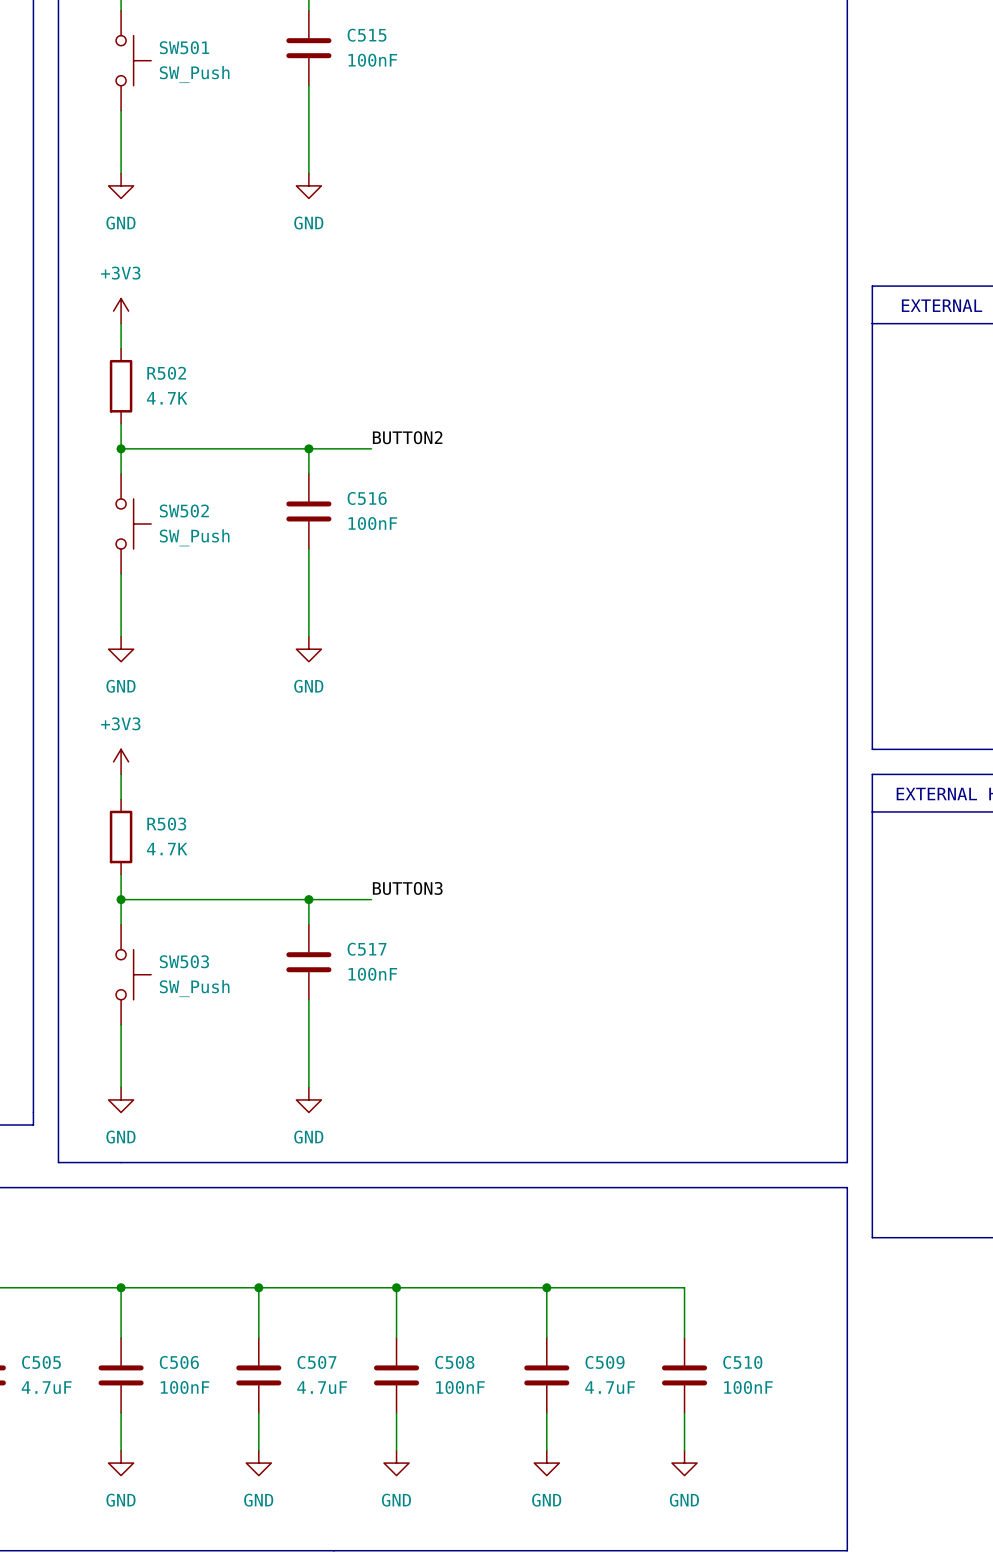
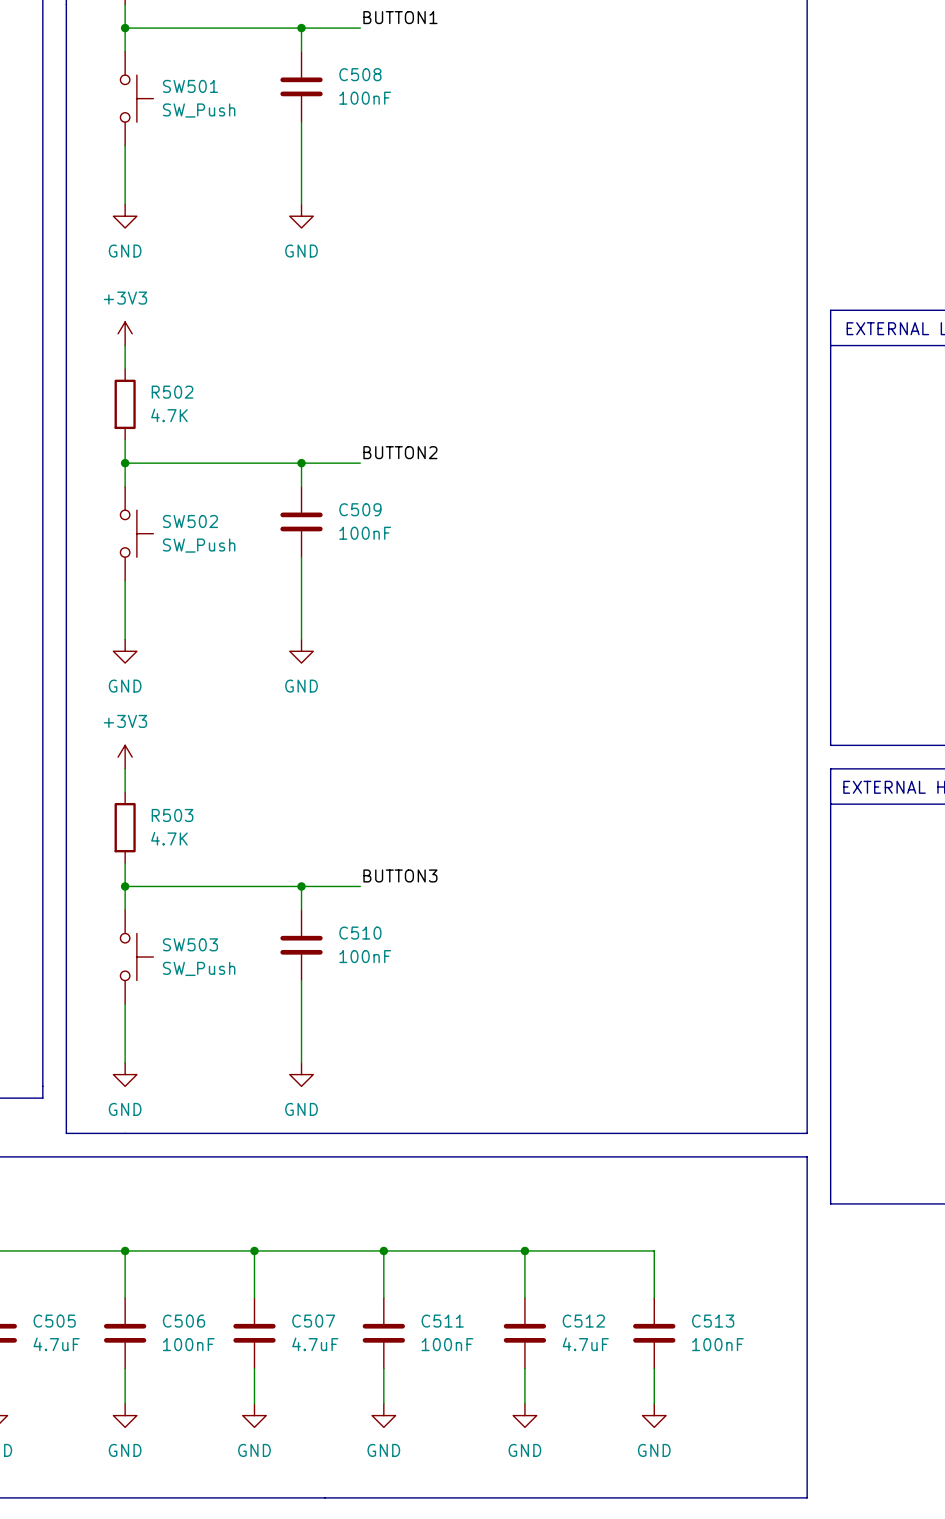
C515 name: C515 (367, 35) -> C508 (360, 74)
C516 name: C516 (367, 498) -> C509 (360, 509)
C517 name: C517 (367, 949) -> C510 (360, 933)
C508 name: C508 (454, 1362) -> C511 (442, 1321)
C509 name: C509 (605, 1362) -> C512 (583, 1321)
C510 name: C510 (742, 1362) -> C513 (713, 1321)

